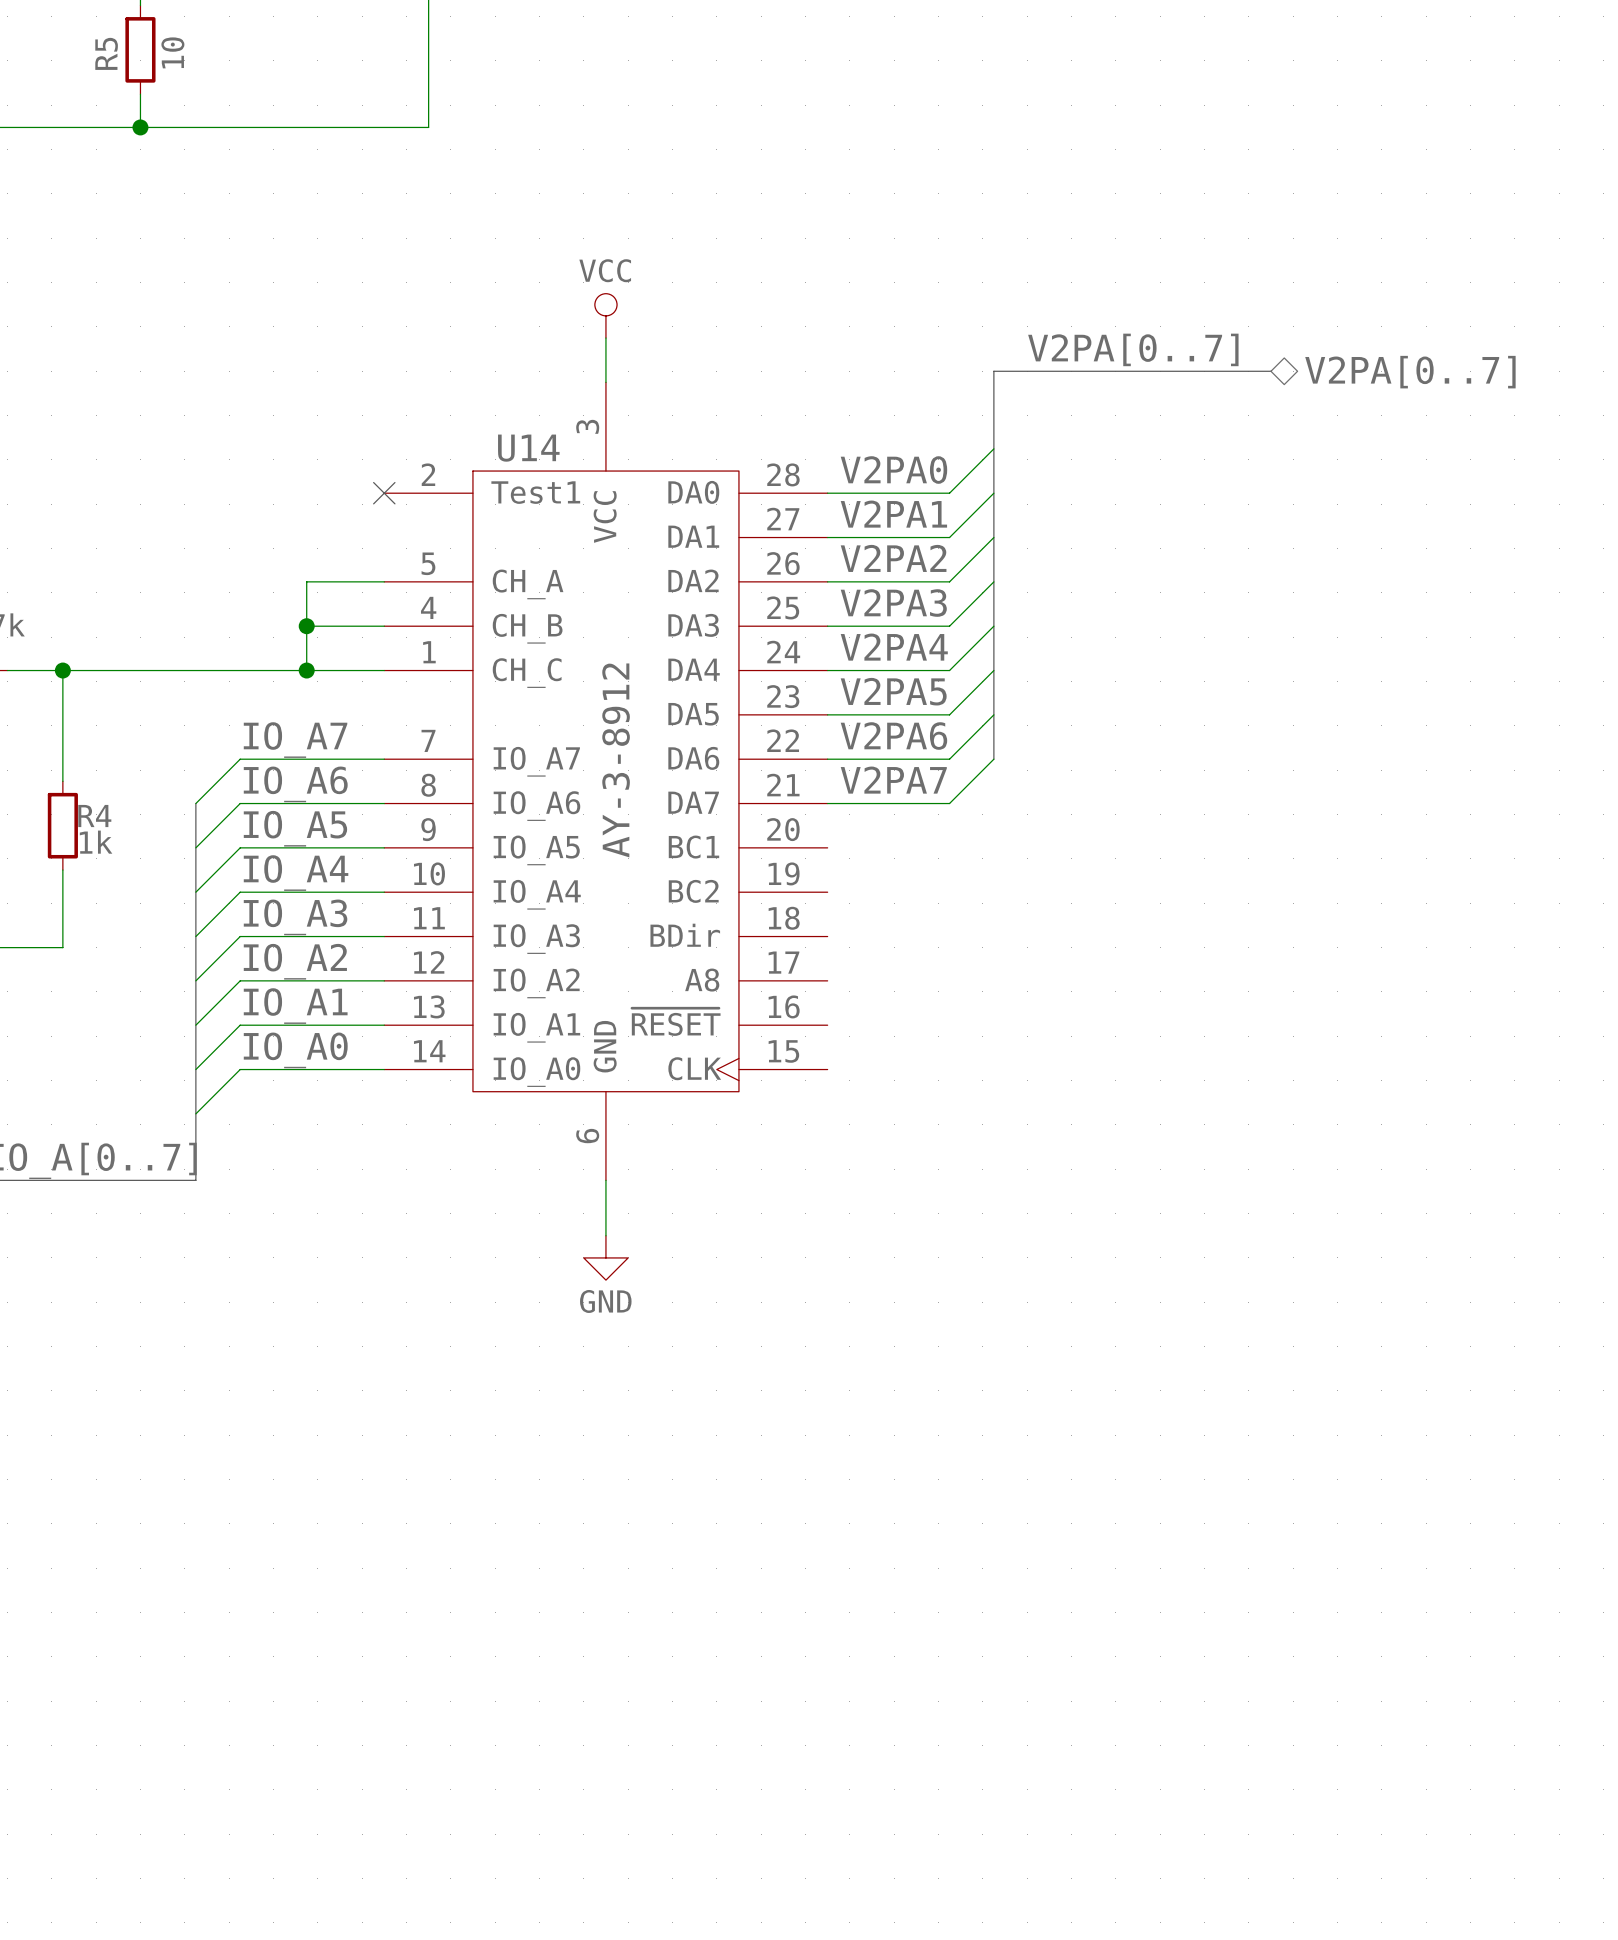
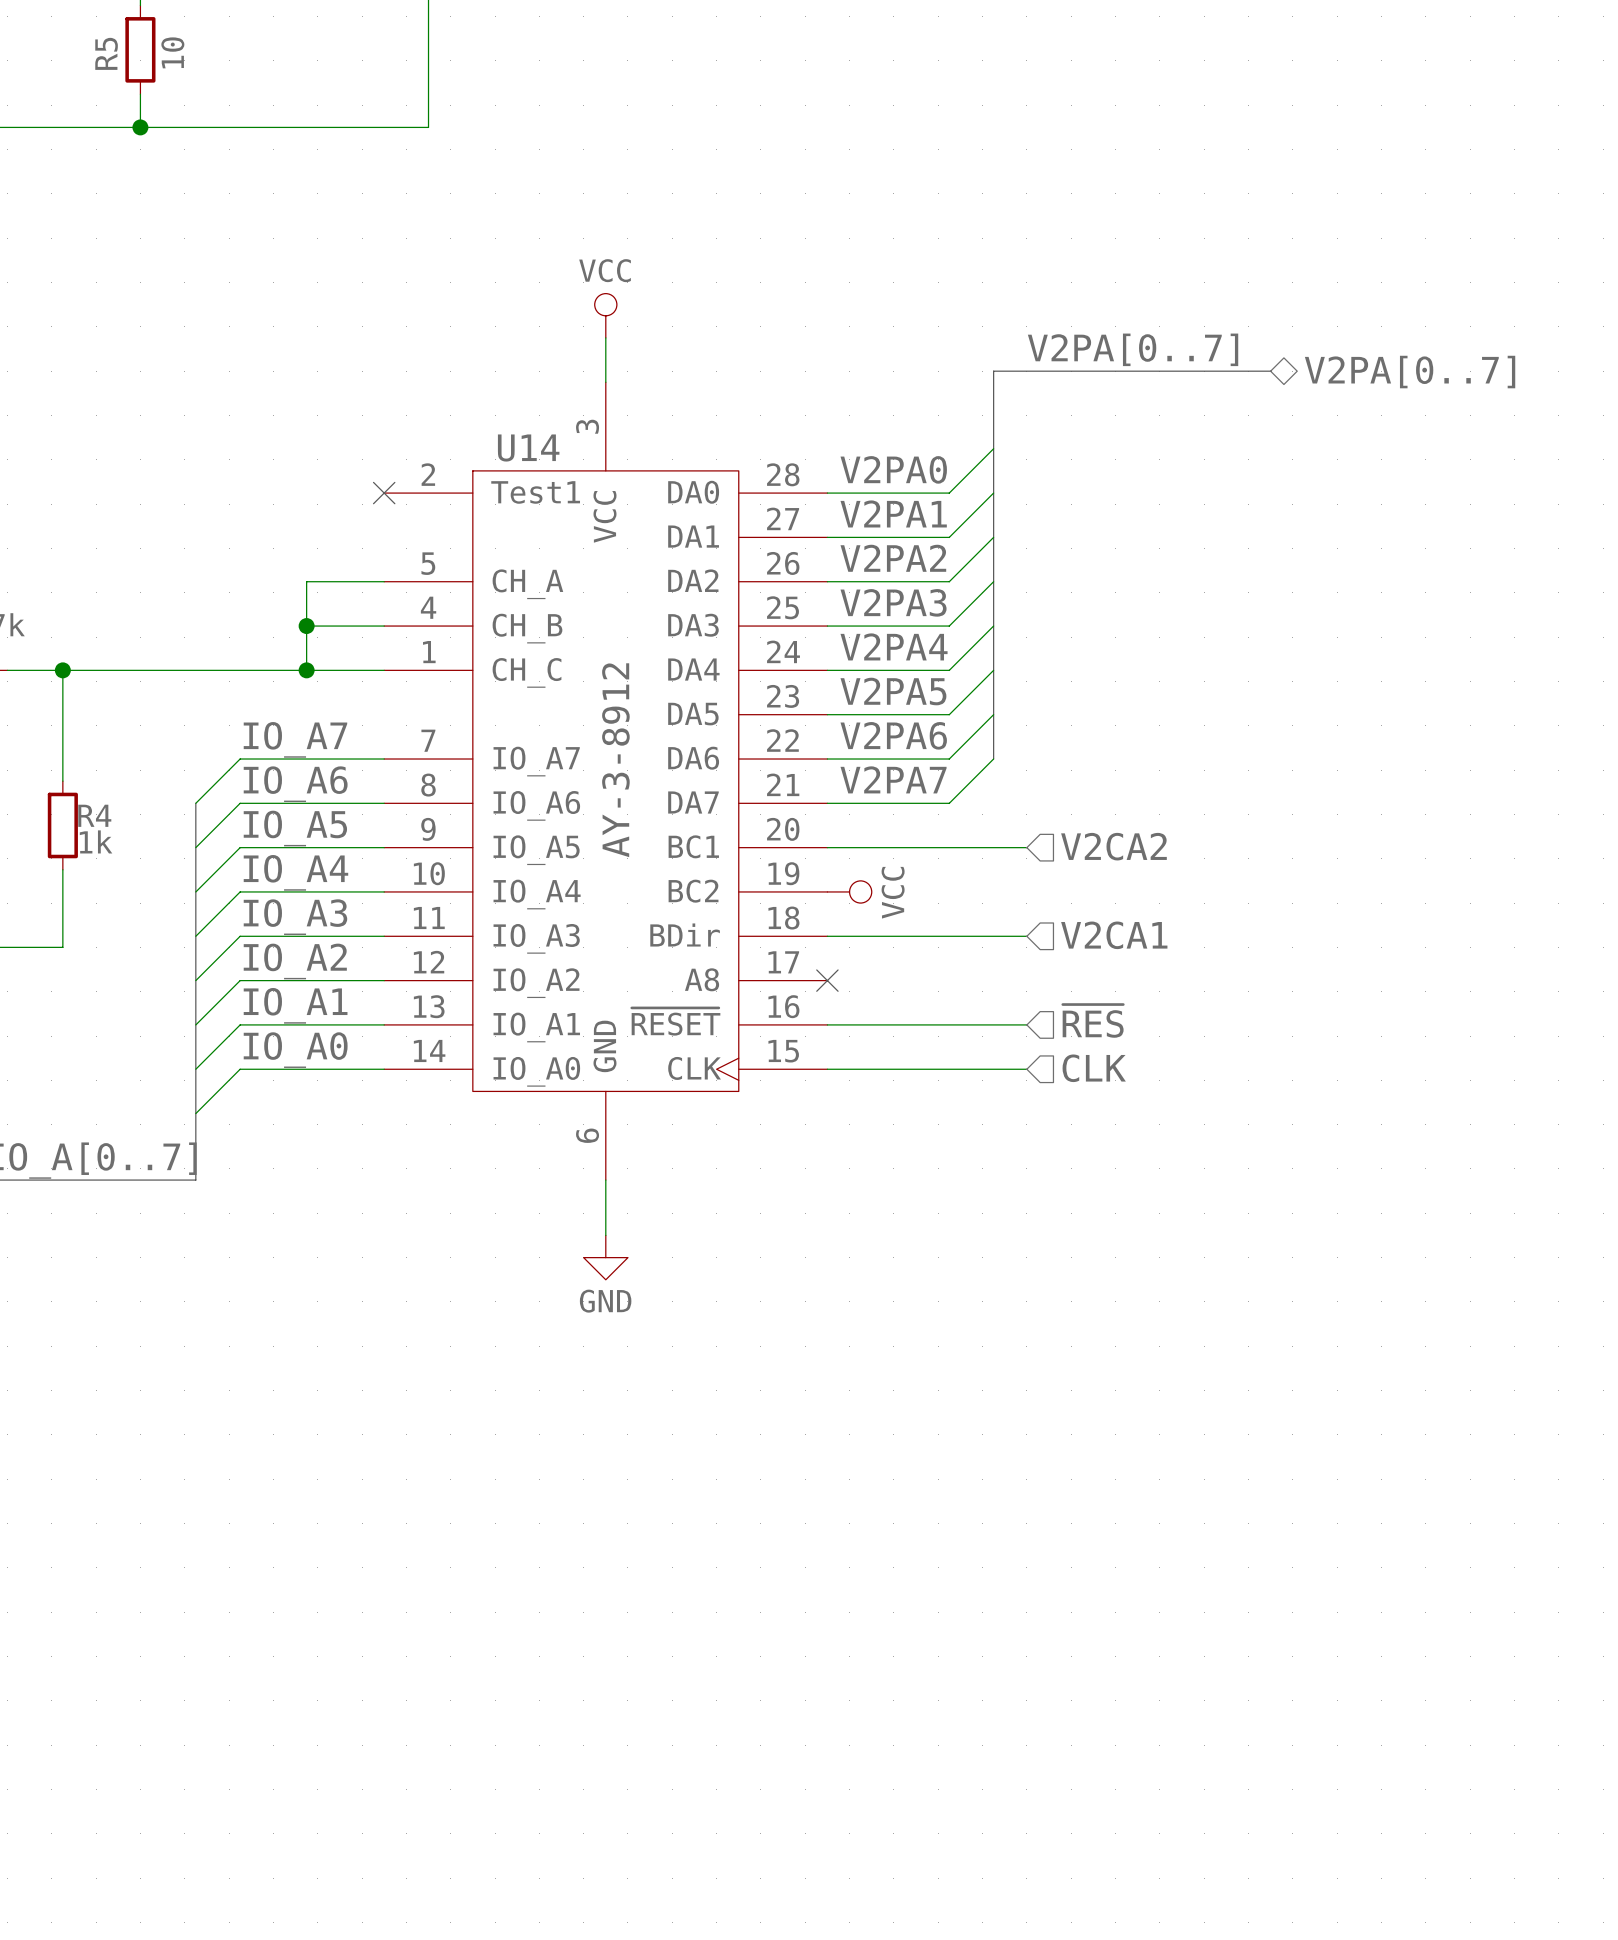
hierarchical label: none -> V2CA2 (1113, 846)
wire: none -> (827, 847) (1026, 847)
power symbol: none -> VCC (849, 891)
hierarchical label: none -> V2CA1 (1114, 935)
wire: none -> (827, 936) (1026, 936)
no-connect mark: none -> (827, 980)
hierarchical label: none -> ~{RES} (1093, 1021)
wire: none -> (827, 1024) (1026, 1024)
hierarchical label: none -> CLK (1094, 1068)
wire: none -> (827, 1069) (1026, 1069)

